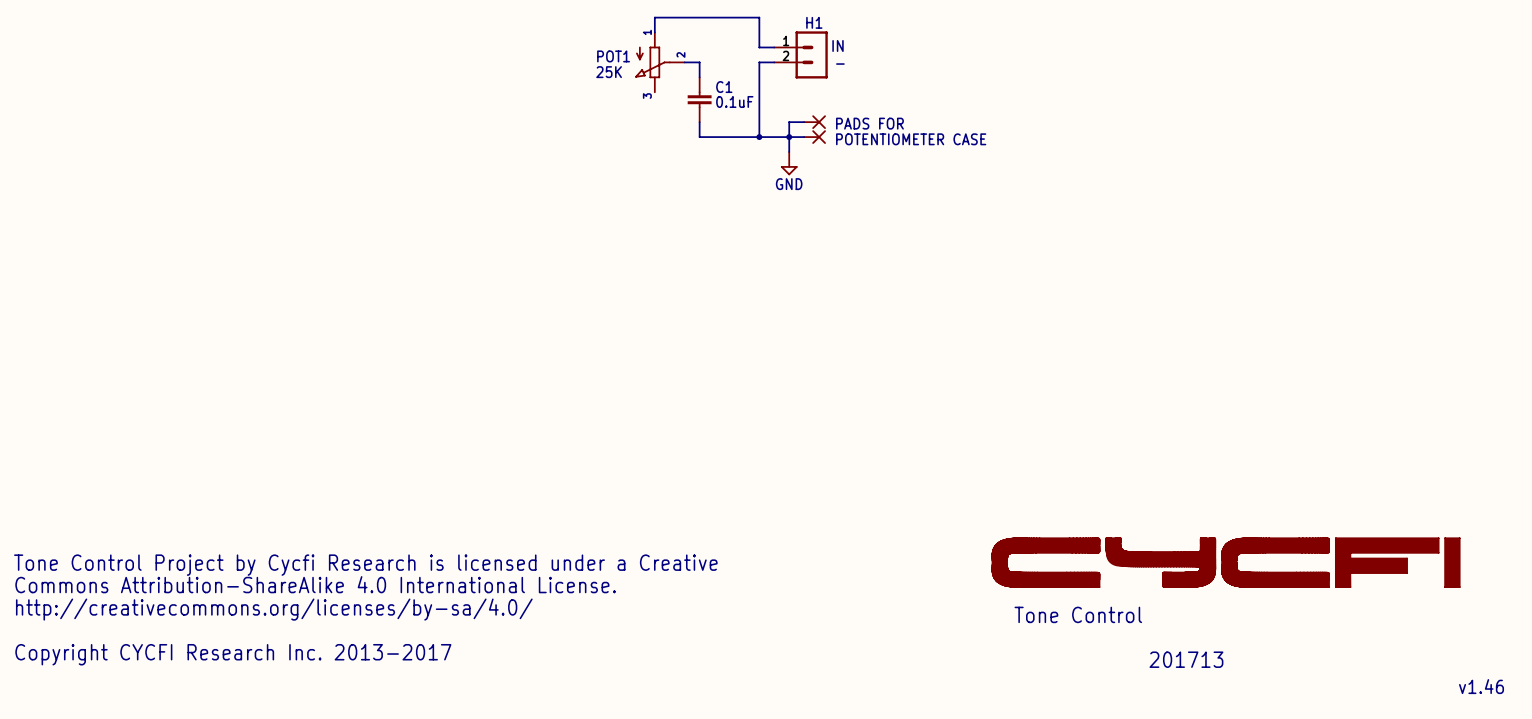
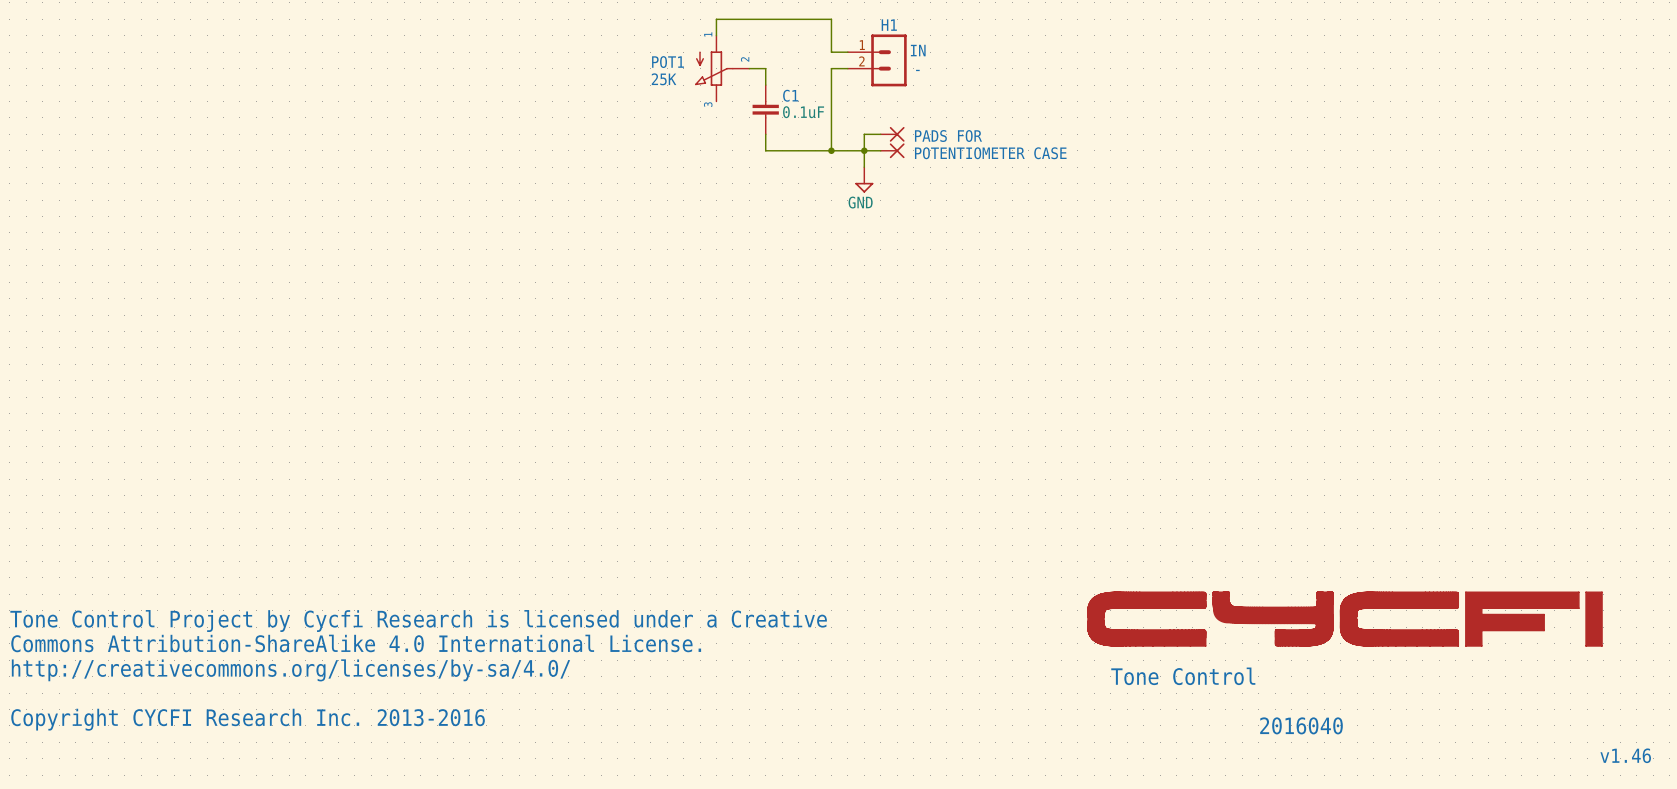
text: Copyright CYCFI Research Inc. 2013-2017 (233, 654) -> Copyright CYCFI Research Inc. 2013-2016 (248, 719)
text: 201713 (1186, 659) -> 2016040 (1301, 725)

